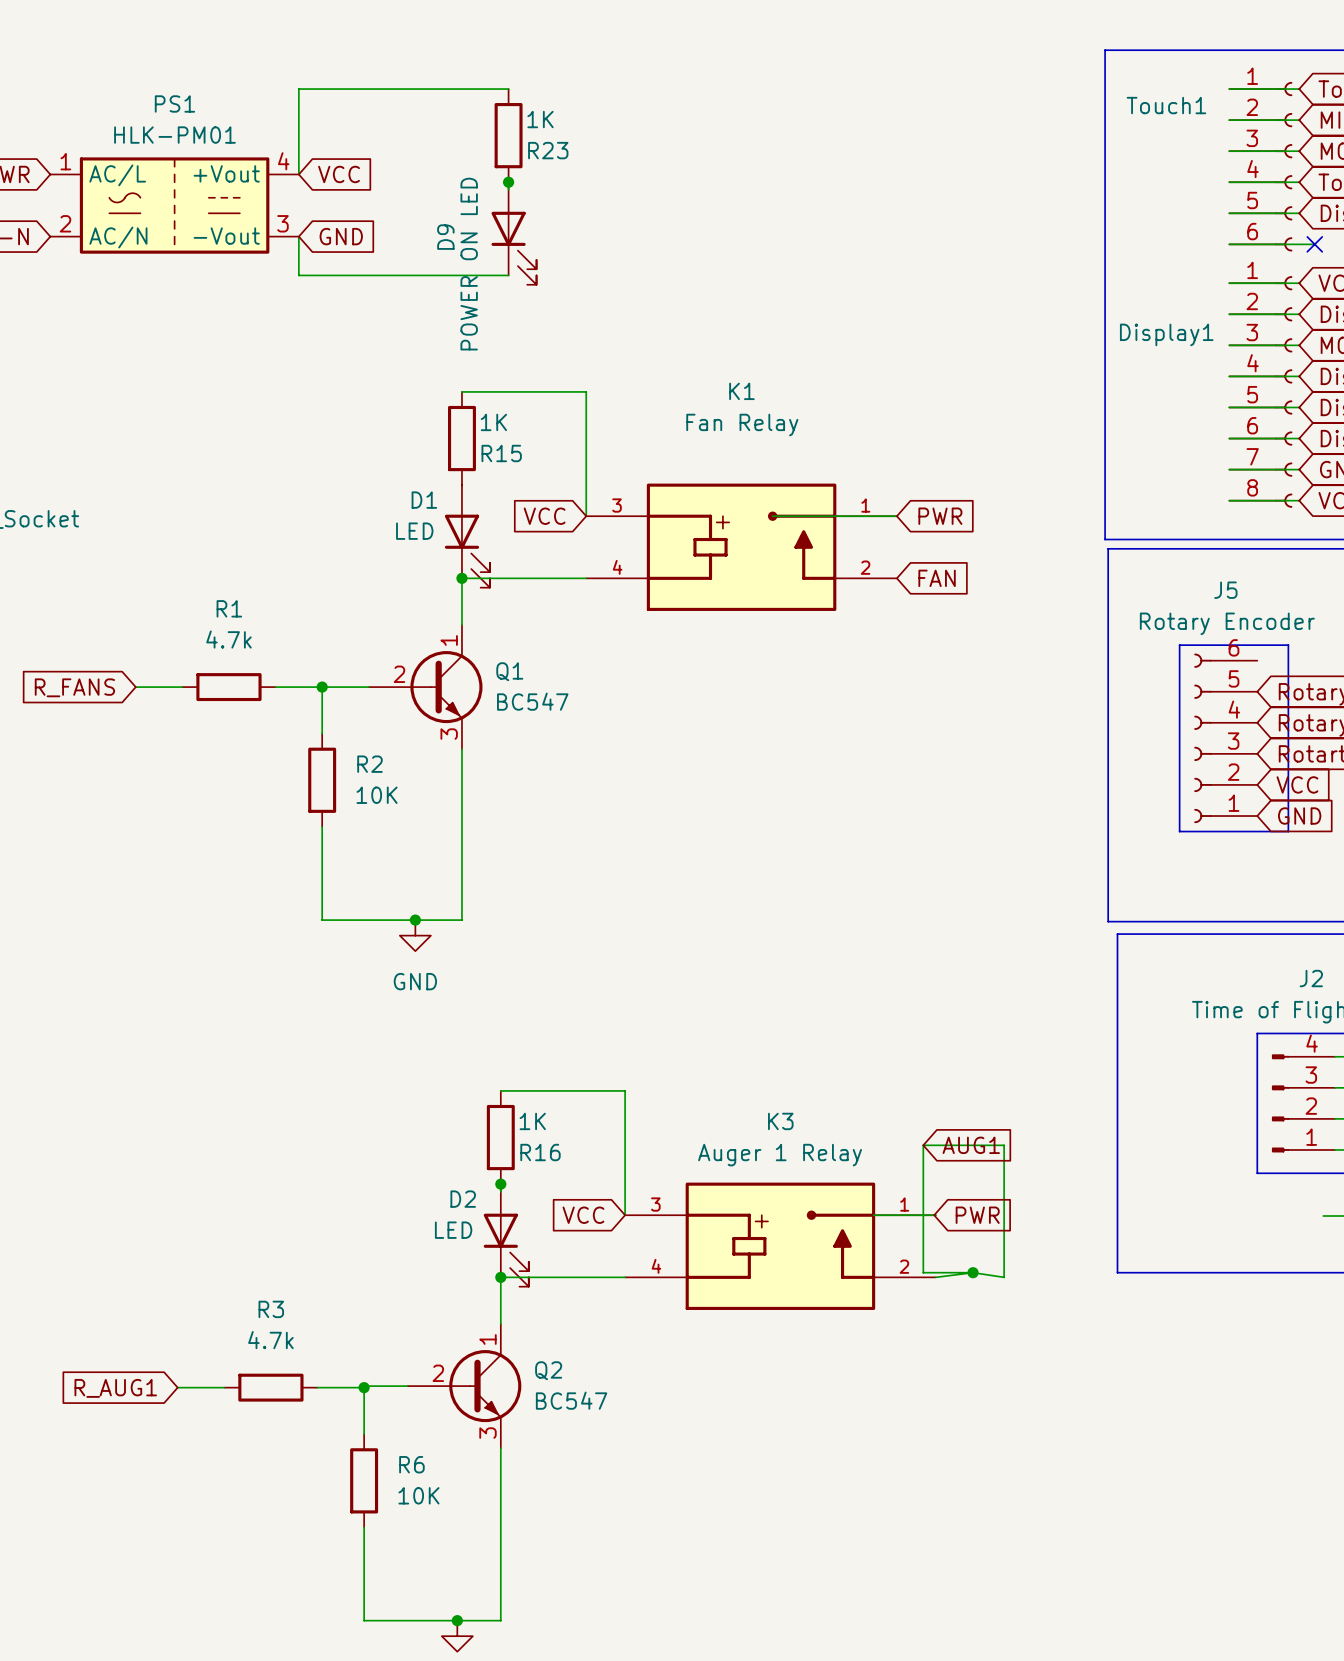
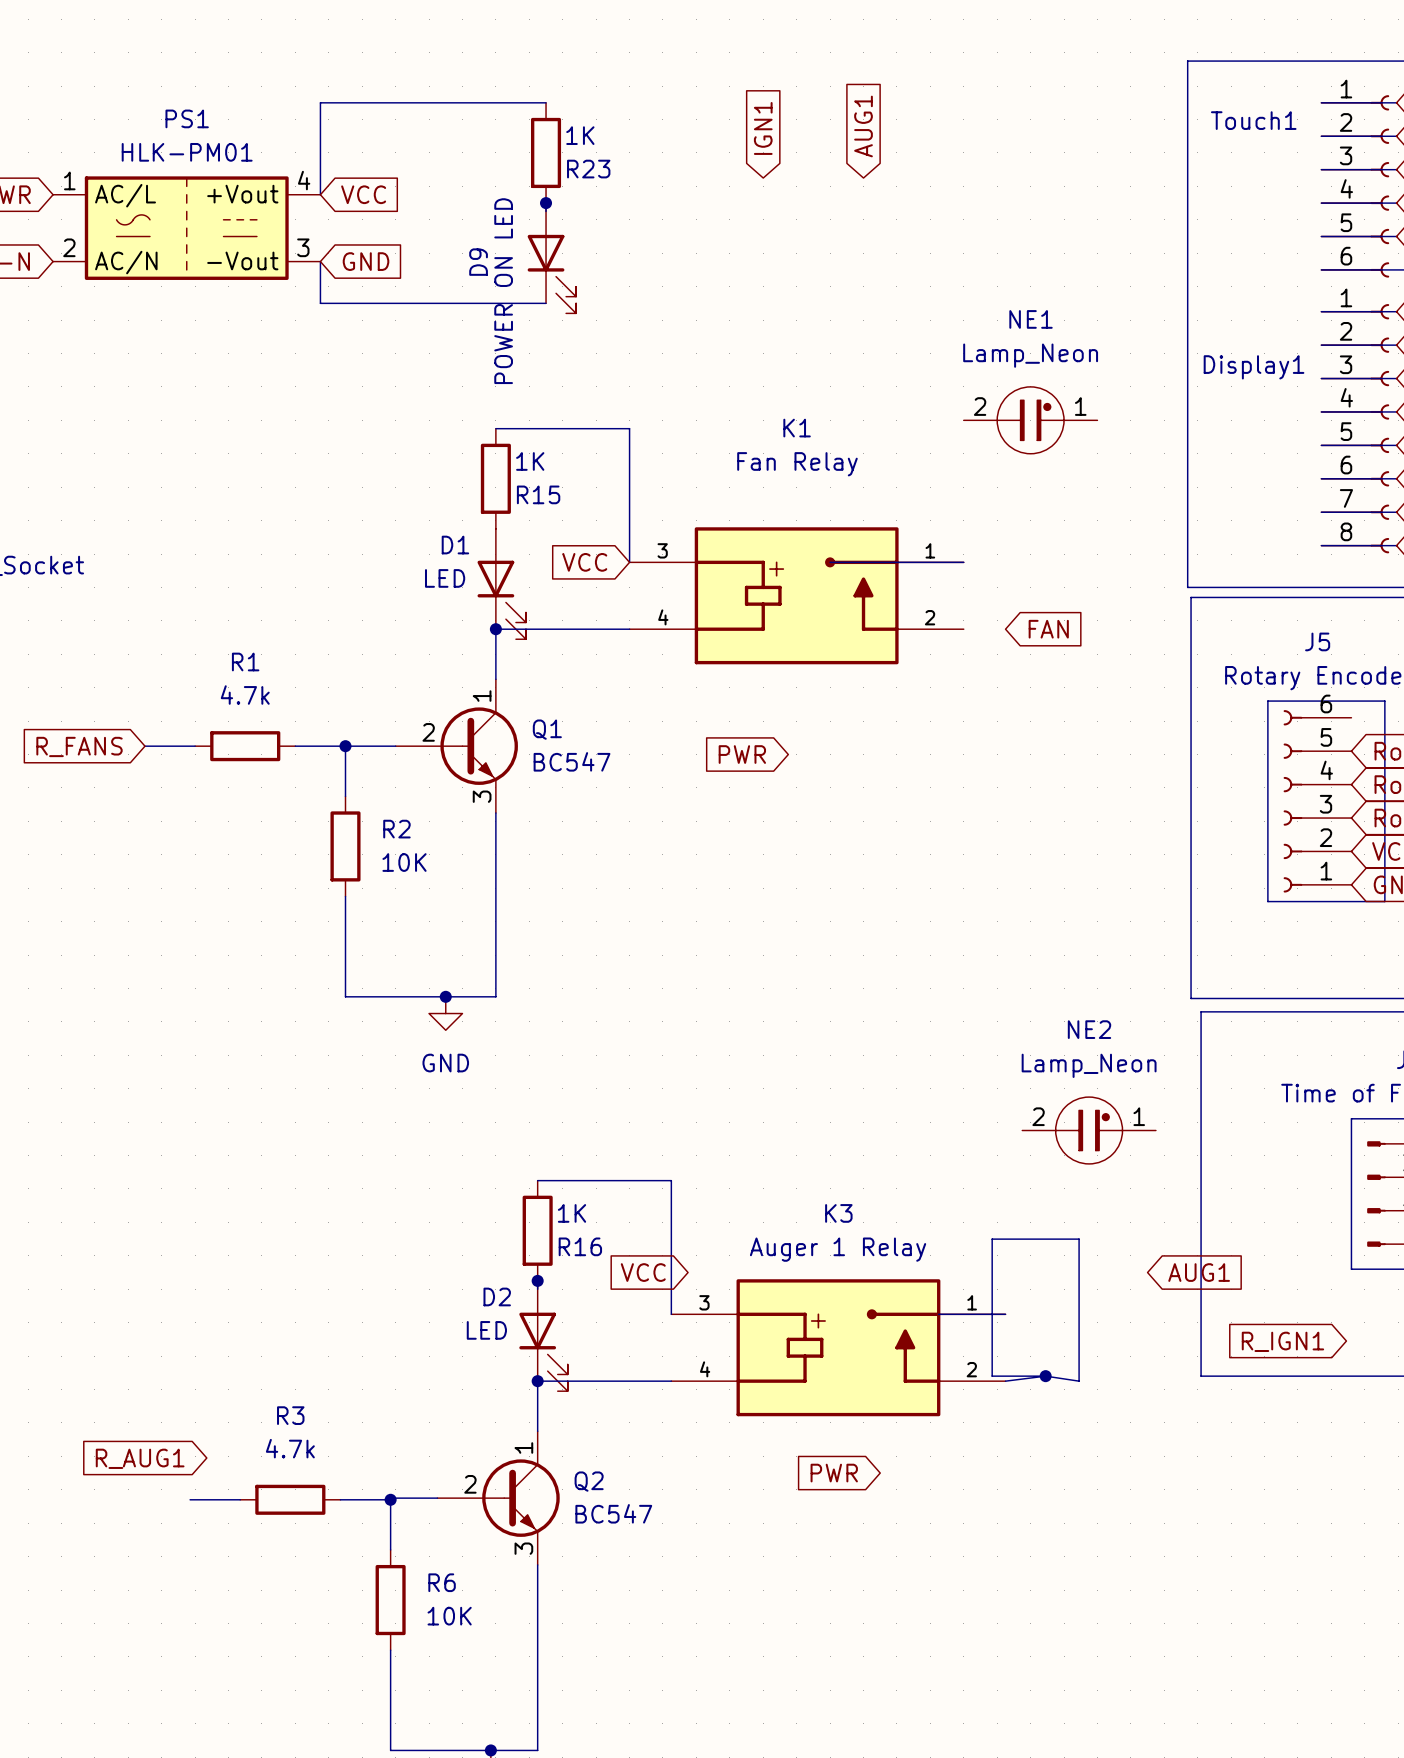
global label: none -> AUG1 (863, 126)
global label: none -> IGN1 (763, 128)
NE1: none -> Lamp_Neon (1030, 420)
global label rotation: 0° (940, 516) -> 180° (742, 754)
global label position: PWR (940, 516) -> PWR (742, 754)
global label position: FAN (937, 578) -> FAN (1048, 629)
NE2: none -> Lamp_Neon (1089, 1130)
global label position: AUG1 (971, 1145) -> AUG1 (1199, 1272)
global label position: VCC (583, 1215) -> VCC (643, 1272)
global label rotation: 0° (977, 1215) -> 180° (834, 1473)
global label position: PWR (977, 1215) -> PWR (834, 1473)
global label: none -> R_IGN1 (1282, 1341)
global label position: R_AUG1 (115, 1388) -> R_AUG1 (140, 1458)

